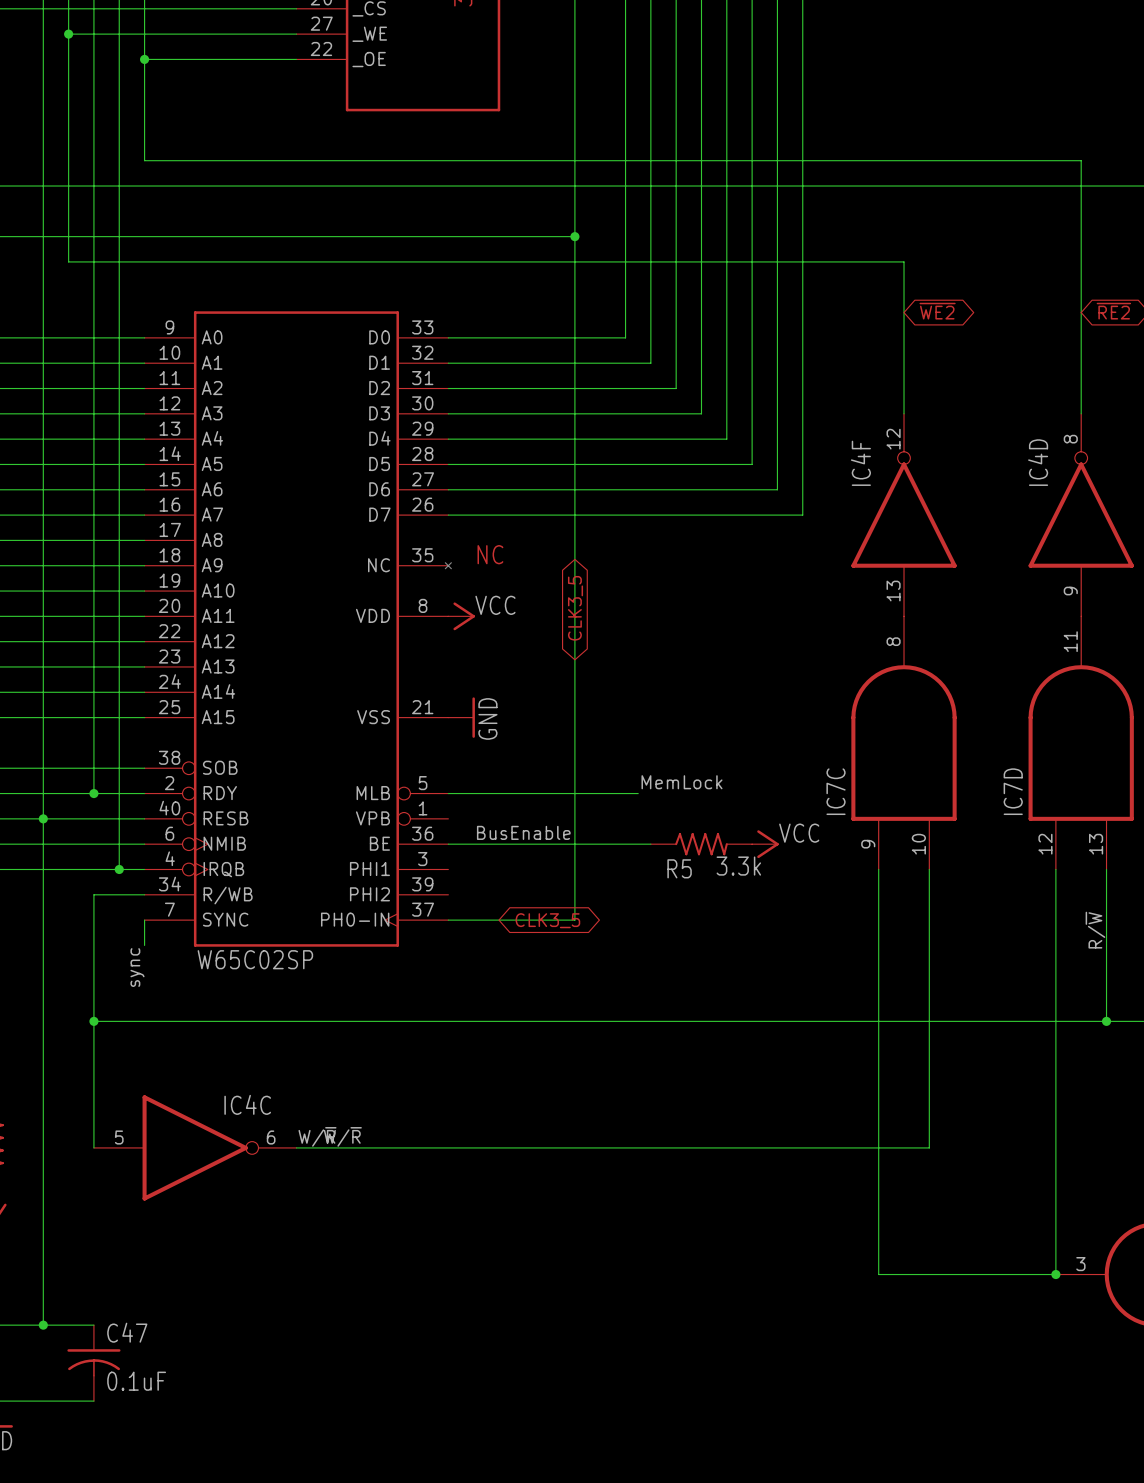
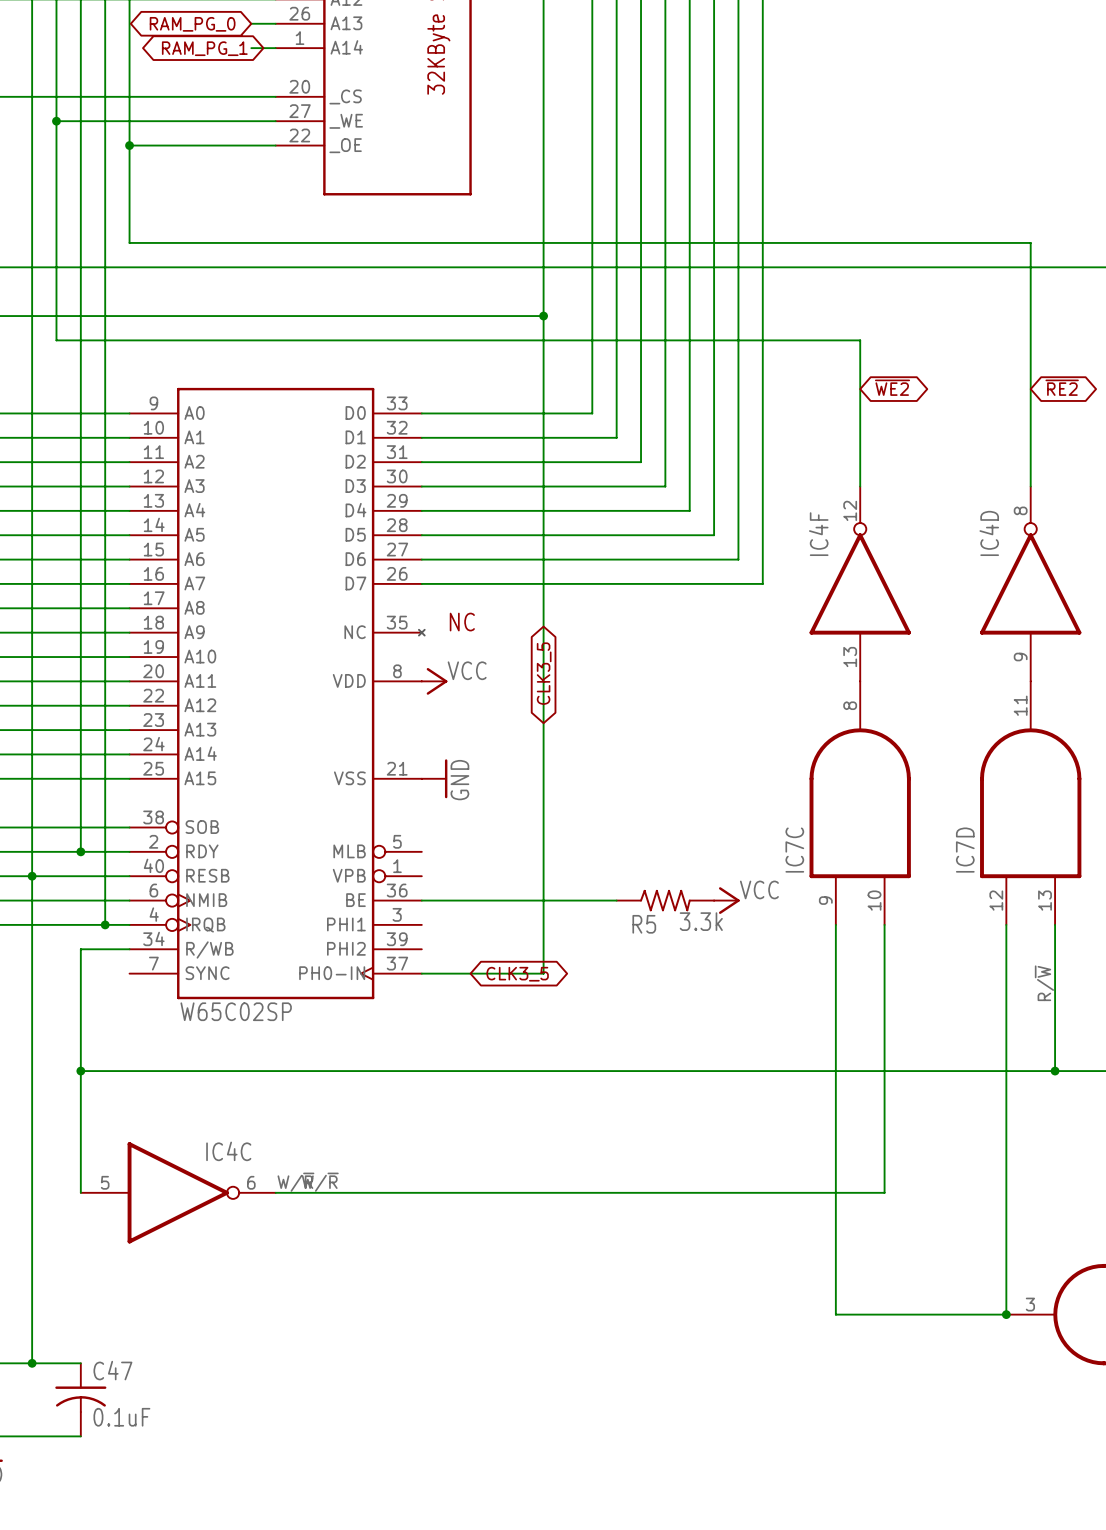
label: MemLock (681, 782) -> none
wire: (448, 793) (638, 793) -> none
label: BusEnable (523, 832) -> none
wire: (144, 920) (144, 945) -> none
label: sync (137, 967) -> none

